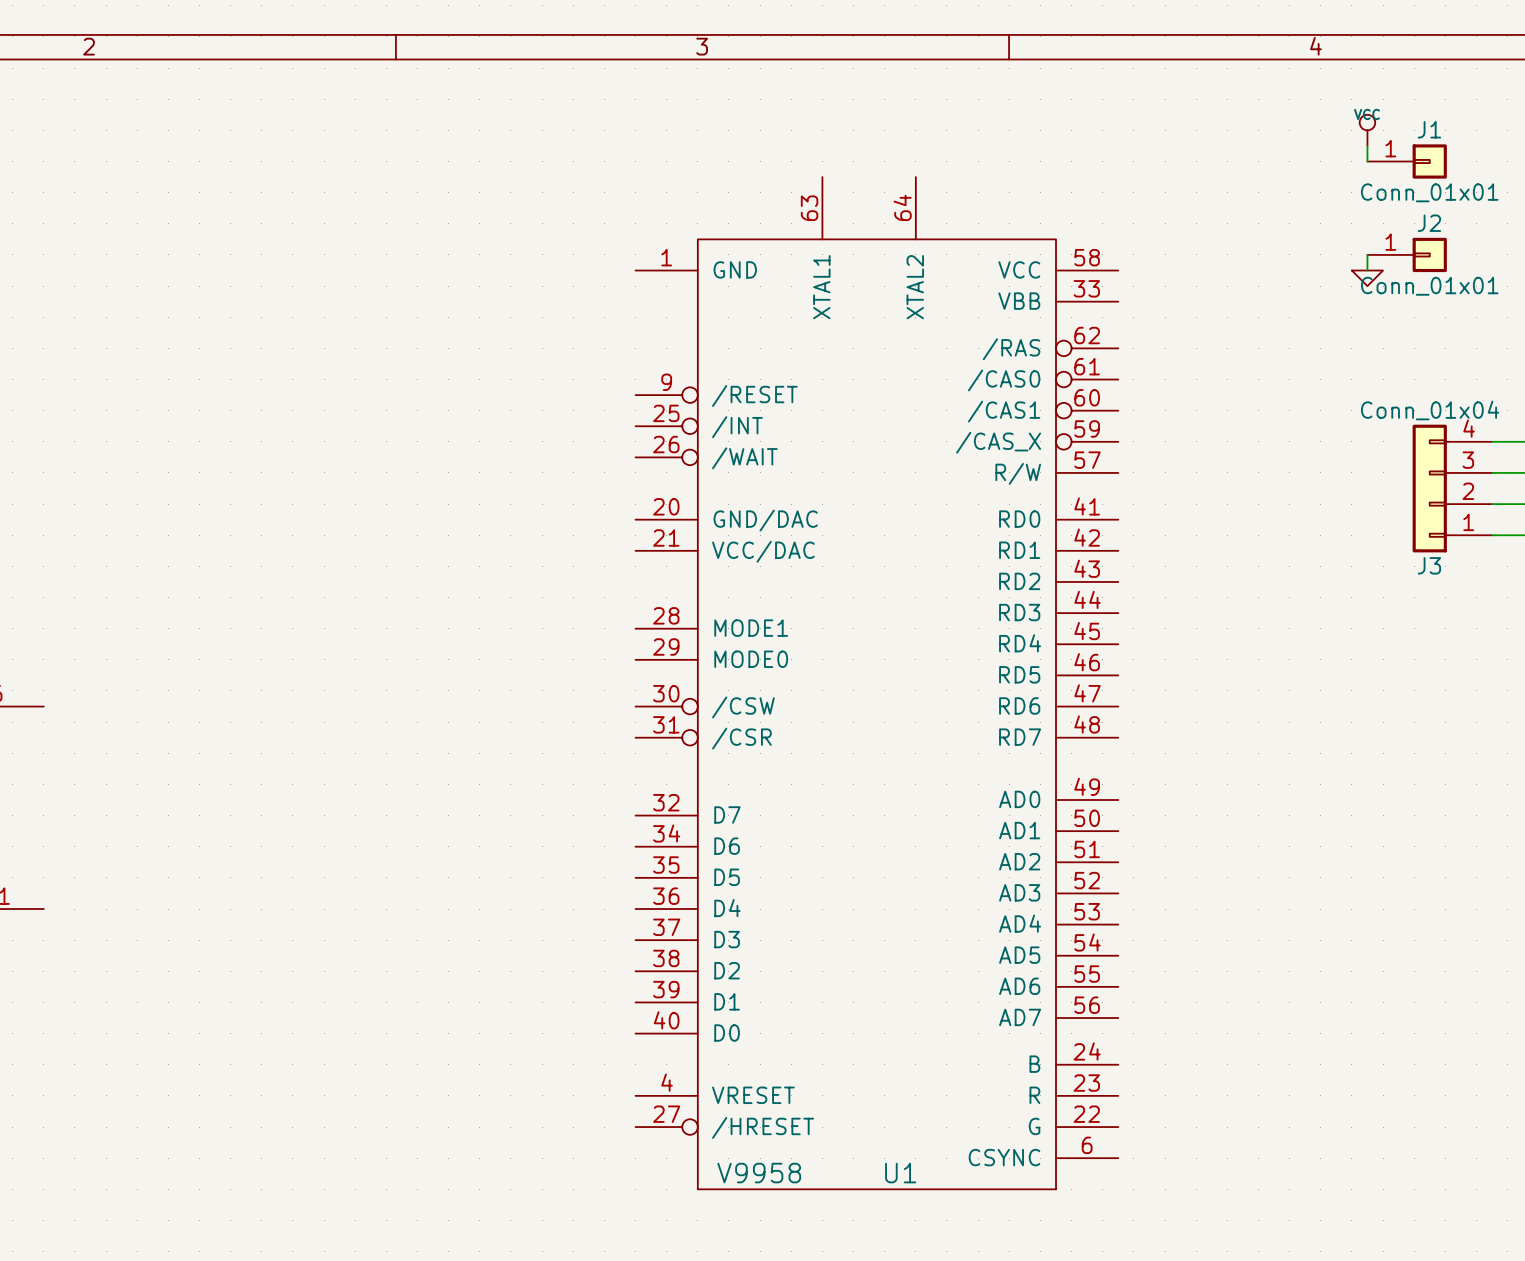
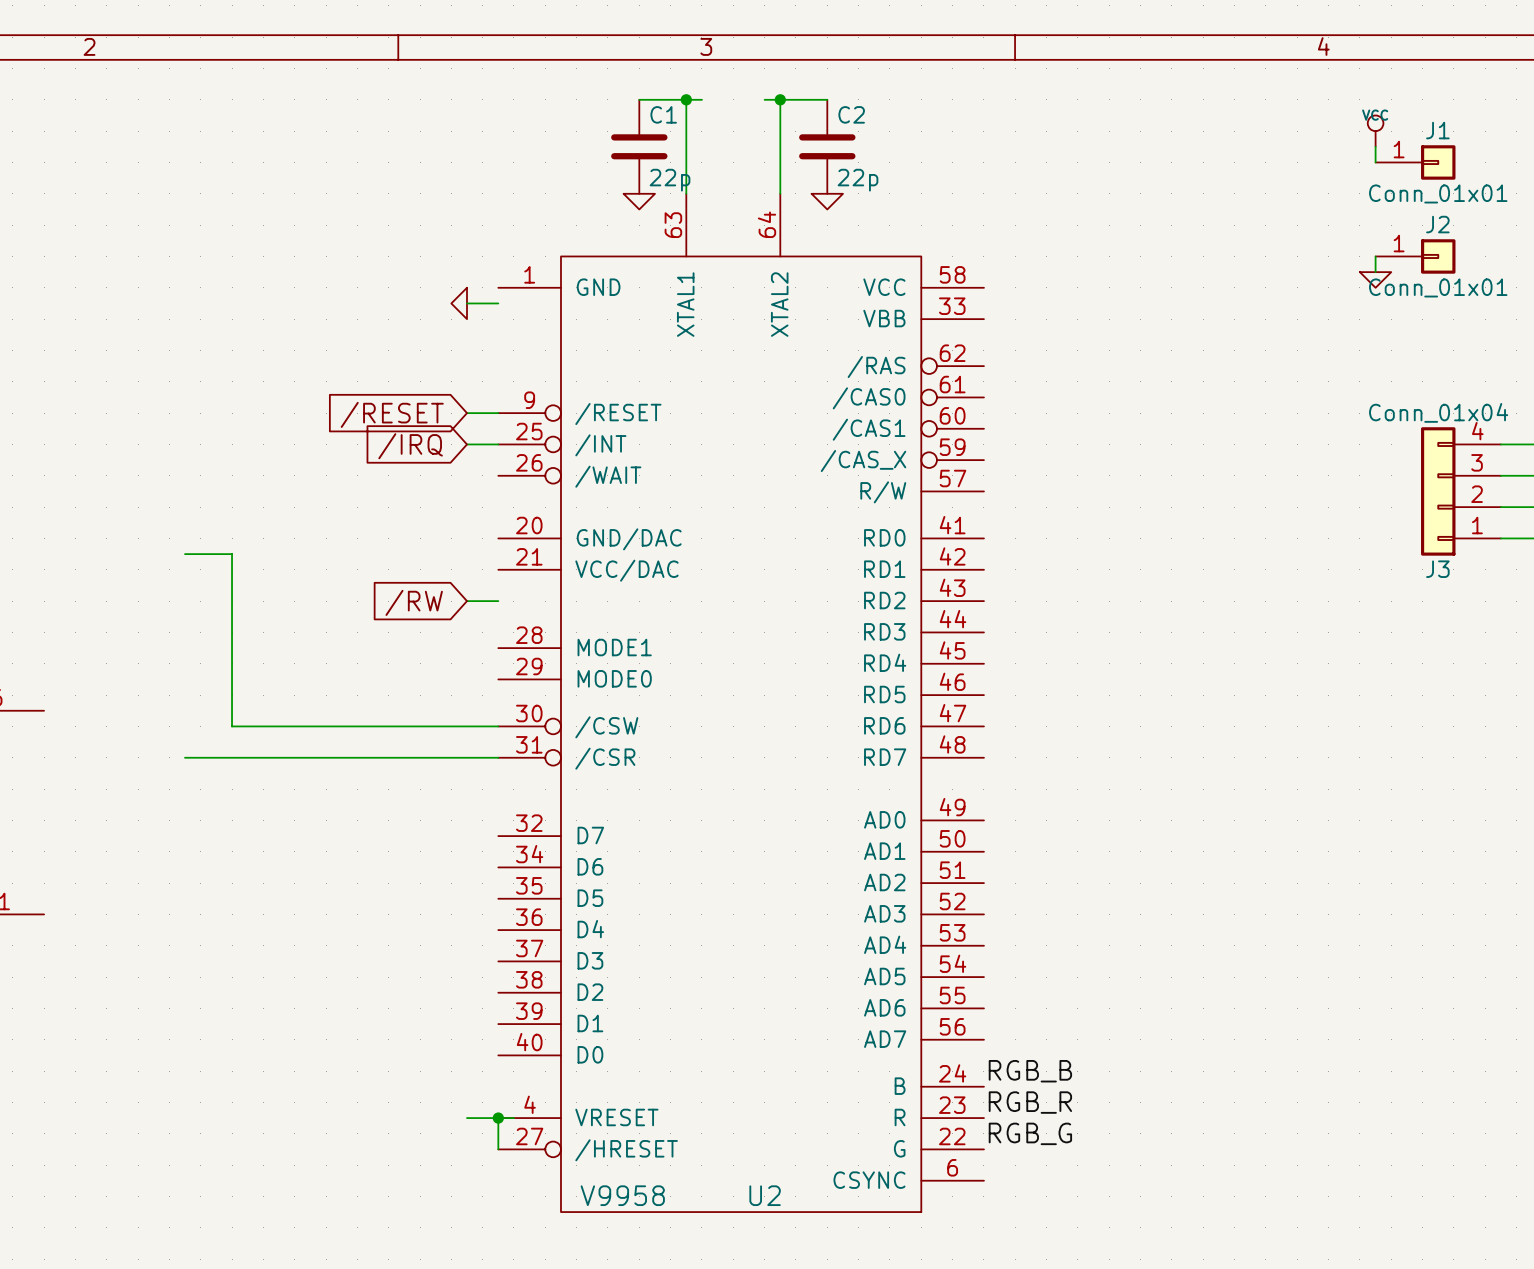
wire: none -> (639, 99) (701, 99)
wire: none -> (686, 99) (686, 193)
junction: none -> (686, 99)
wire: none -> (764, 99) (827, 99)
wire: none -> (780, 99) (780, 193)
junction: none -> (780, 99)
C1: none -> 22p (639, 146)
C2: none -> 22p (827, 146)
power symbol: none -> (639, 201)
power symbol: none -> (827, 201)
power symbol: none -> (459, 303)
wire: none -> (466, 303) (498, 303)
wire: none -> (466, 413) (498, 413)
global label: none -> /RESET (392, 414)
wire: none -> (466, 444) (498, 444)
global label: none -> /IRQ (410, 446)
wire: none -> (185, 554) (232, 554) (232, 726) (498, 726)
wire: none -> (466, 601) (498, 601)
global label: none -> /RW (414, 602)
U1: V9958 (876, 683) -> none
U2: none -> V9958 (741, 702)
wire: none -> (185, 757) (498, 757)
label: none -> RGB_B (1030, 1071)
label: none -> RGB_R (1030, 1102)
wire: none -> (466, 1118) (513, 1118)
wire: none -> (498, 1118) (498, 1149)
junction: none -> (498, 1118)
label: none -> RGB_G (1030, 1133)

